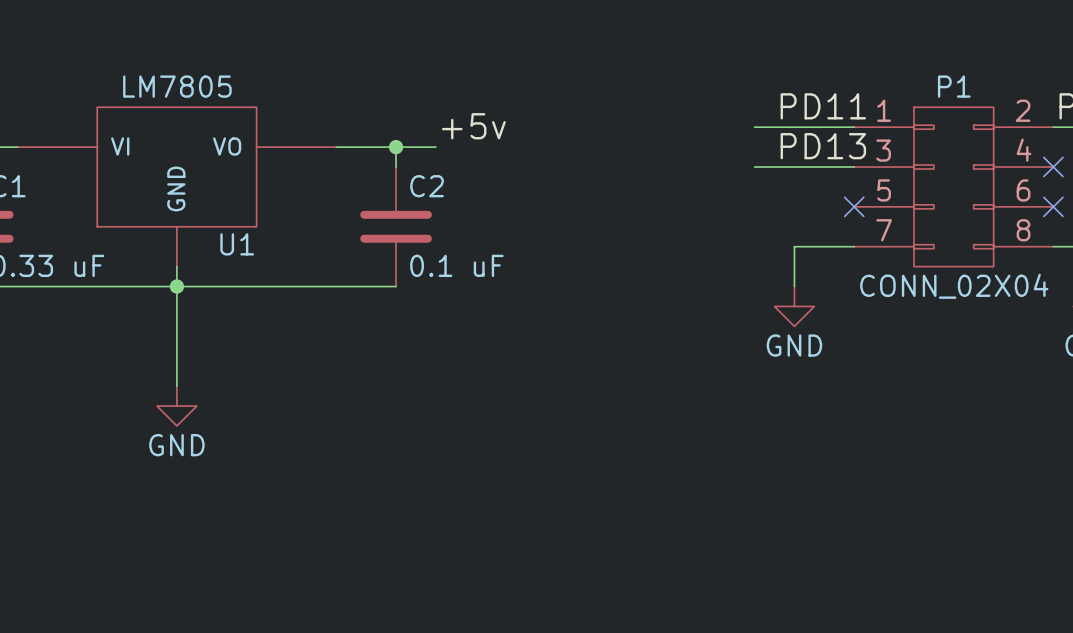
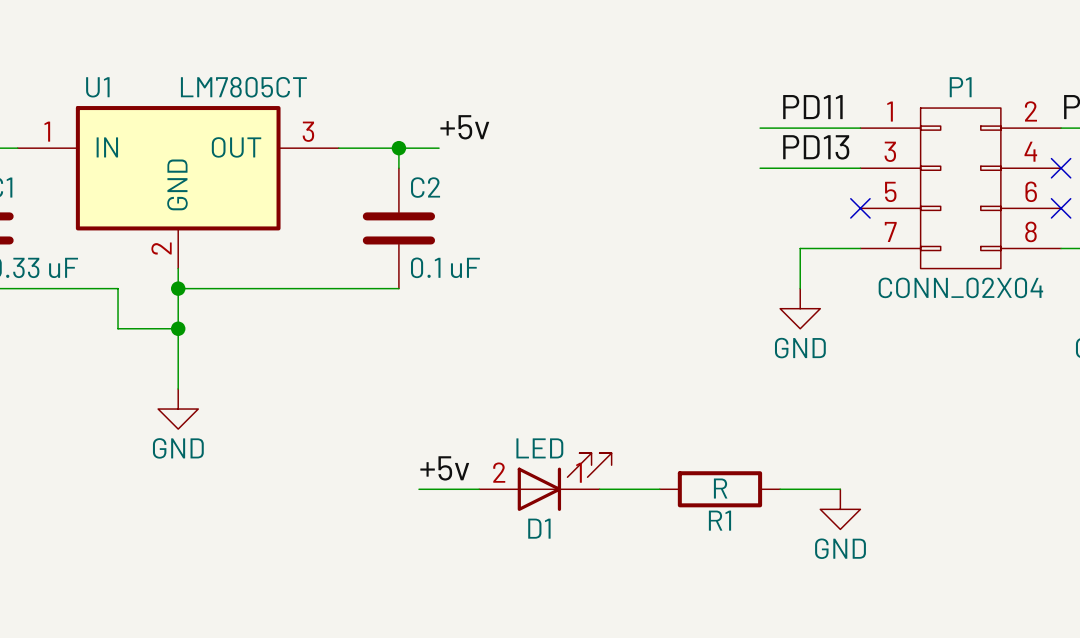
U1 value: LM7805 (177, 86) -> LM7805CT (243, 87)
U1 symbol: [17, 107, 337, 267] -> [17, 106, 339, 269]
U1 name position: U1 (237, 244) -> U1 (97, 87)
wire: (117, 286) (176, 286) -> (118, 288) (118, 328) (178, 328)
junction: none -> (178, 328)
label: none -> +5v (444, 468)
D1: none -> LED (545, 482)
wire: none -> (418, 489) (479, 489)
wire: none -> (599, 489) (659, 489)
R1: none -> R (719, 489)
wire: none -> (780, 489) (840, 489)
power symbol: none -> GND (840, 509)

